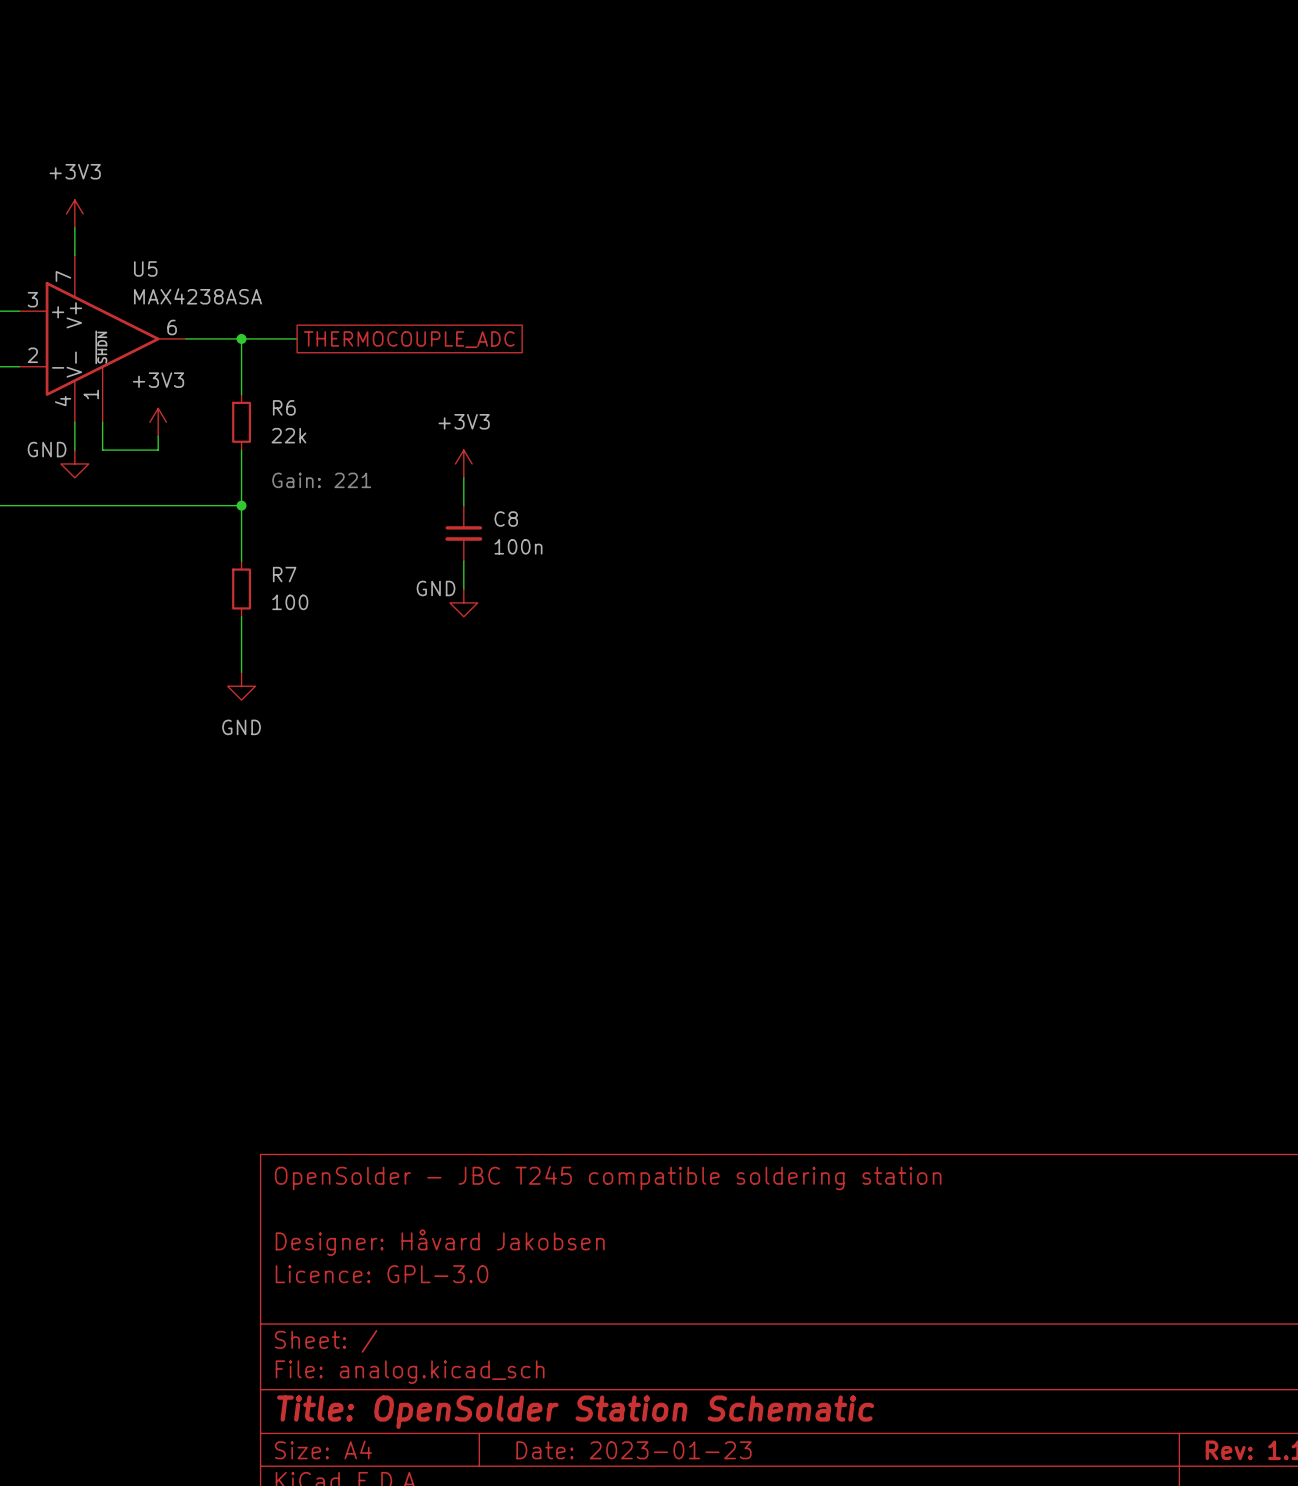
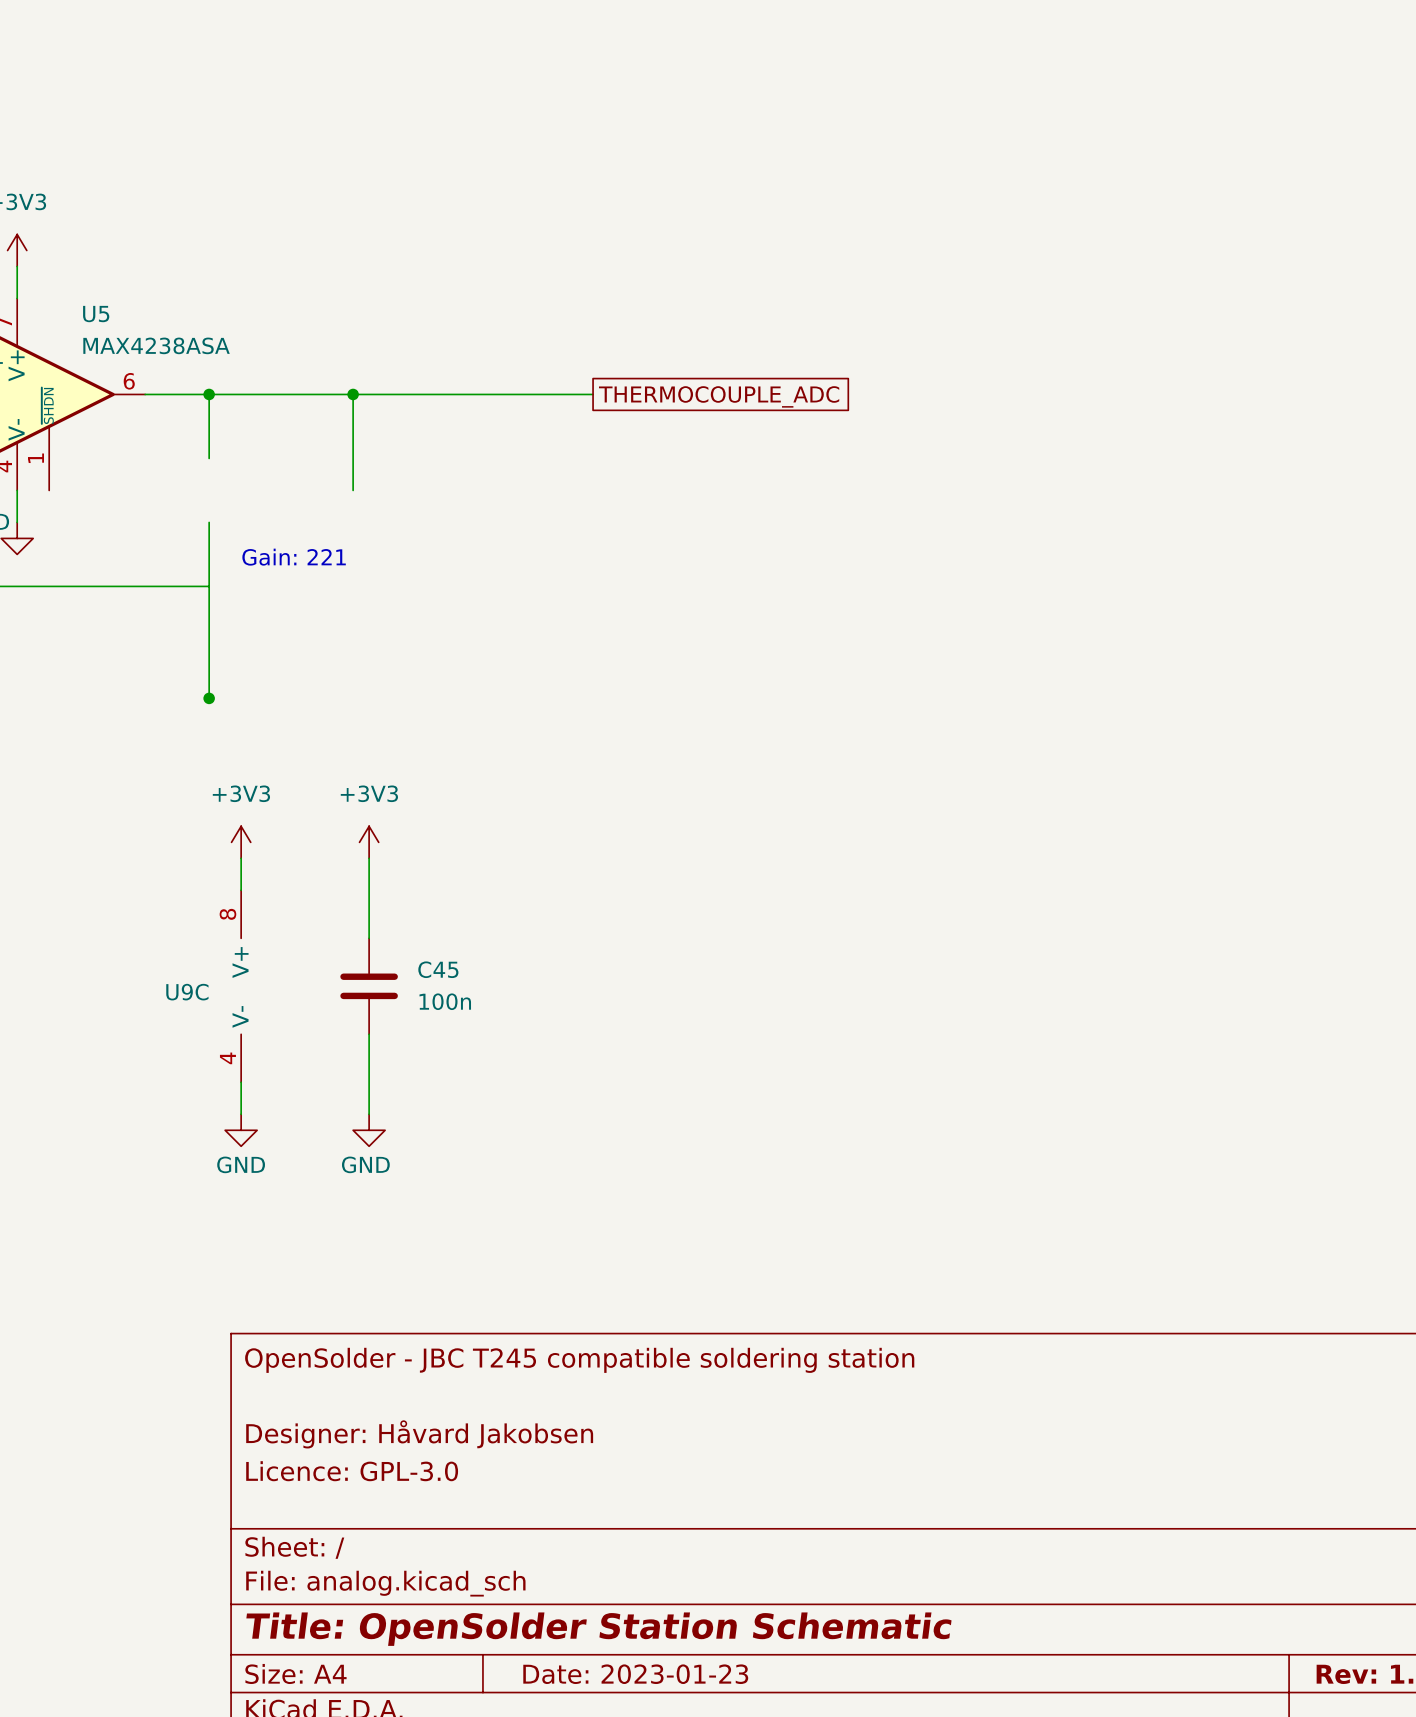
wire: none -> (273, 394) (593, 394)
wire: none -> (353, 394) (353, 490)
junction: none -> (353, 394)
global label: THERMOCOUPLE_ADC (409, 339) -> none
global label: none -> THERMOCOUPLE_ADC (719, 396)
wire: (102, 422) (102, 450) (158, 450) (158, 436) -> none
power symbol: +3V3 (158, 422) -> none
R6: 22k (241, 422) -> none
power symbol: +3V3 (463, 463) -> none
wire: (463, 477) (463, 505) -> none
junction: (241, 505) -> none
C8: 100n (463, 533) -> none
wire: none -> (209, 650) (209, 698)
wire: (463, 561) (463, 589) -> (241, 858) (241, 890)
R7: 100 (241, 589) -> none
junction: none -> (209, 698)
power symbol: GND (463, 602) -> none
wire: (241, 616) (241, 672) -> none
power symbol: GND (241, 686) -> none
power symbol: none -> +3V3 (241, 842)
power symbol: none -> +3V3 (369, 842)
wire: none -> (369, 858) (369, 938)
U9C: none -> (241, 986)
C45: none -> 100n (369, 986)
wire: none -> (369, 1034) (369, 1114)
wire: none -> (241, 1082) (241, 1114)
power symbol: none -> GND (241, 1130)
power symbol: none -> GND (369, 1130)

